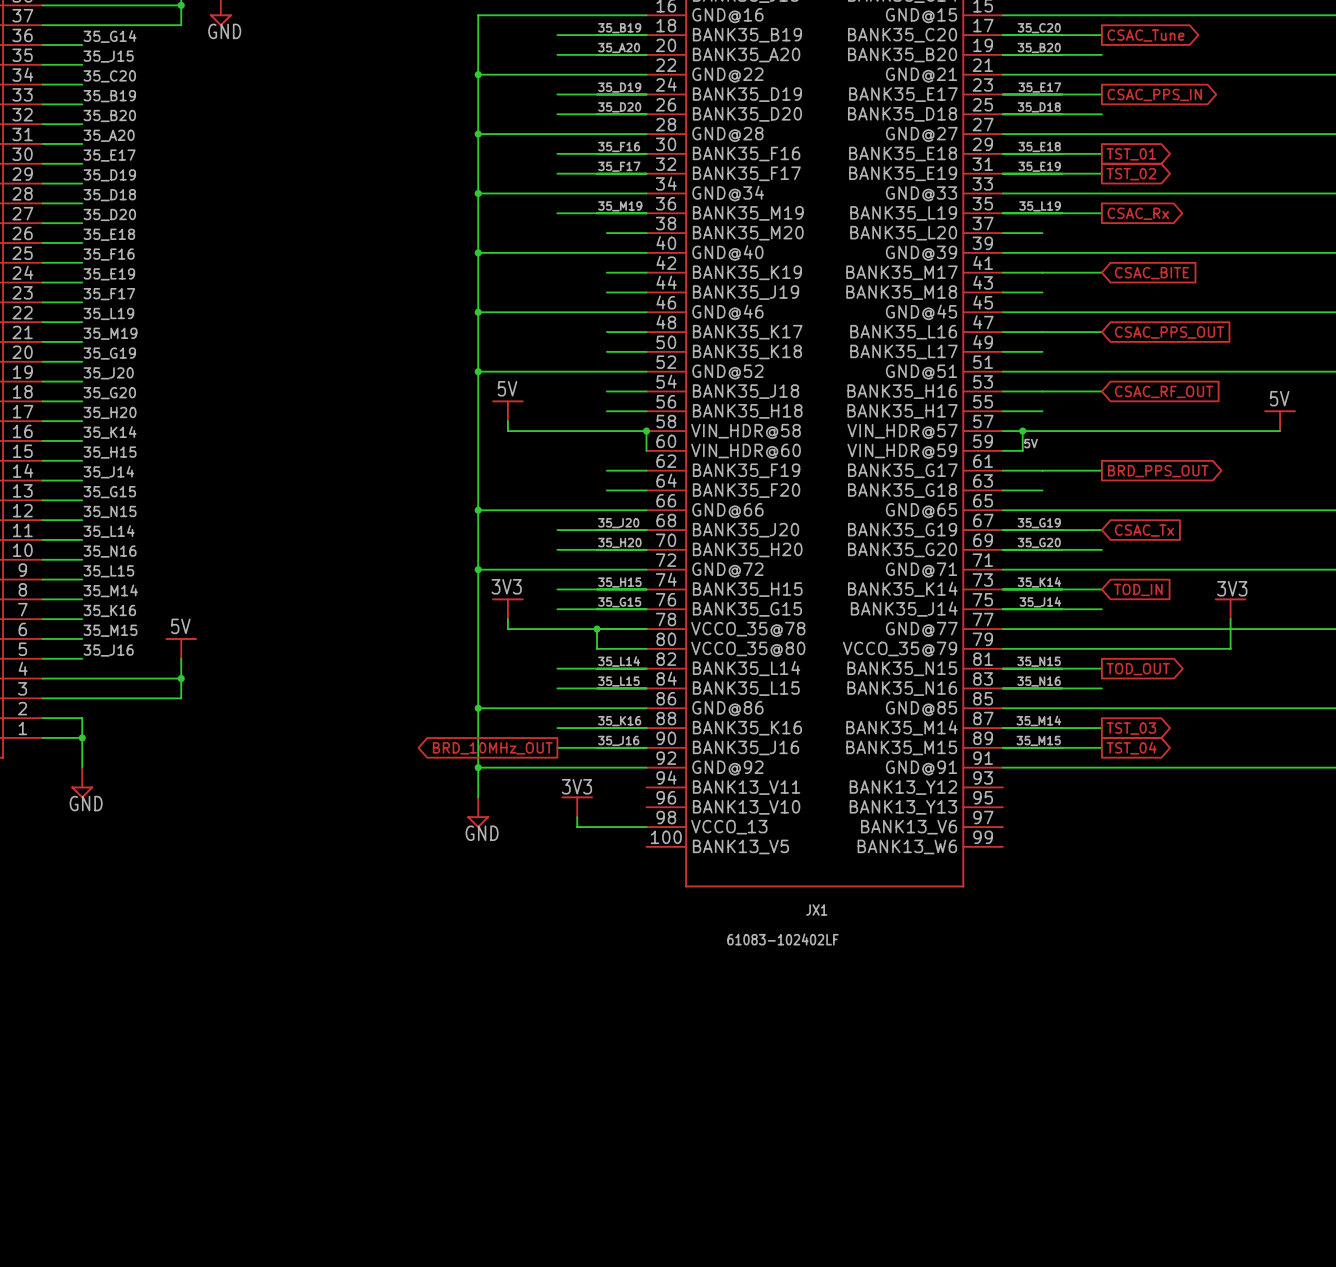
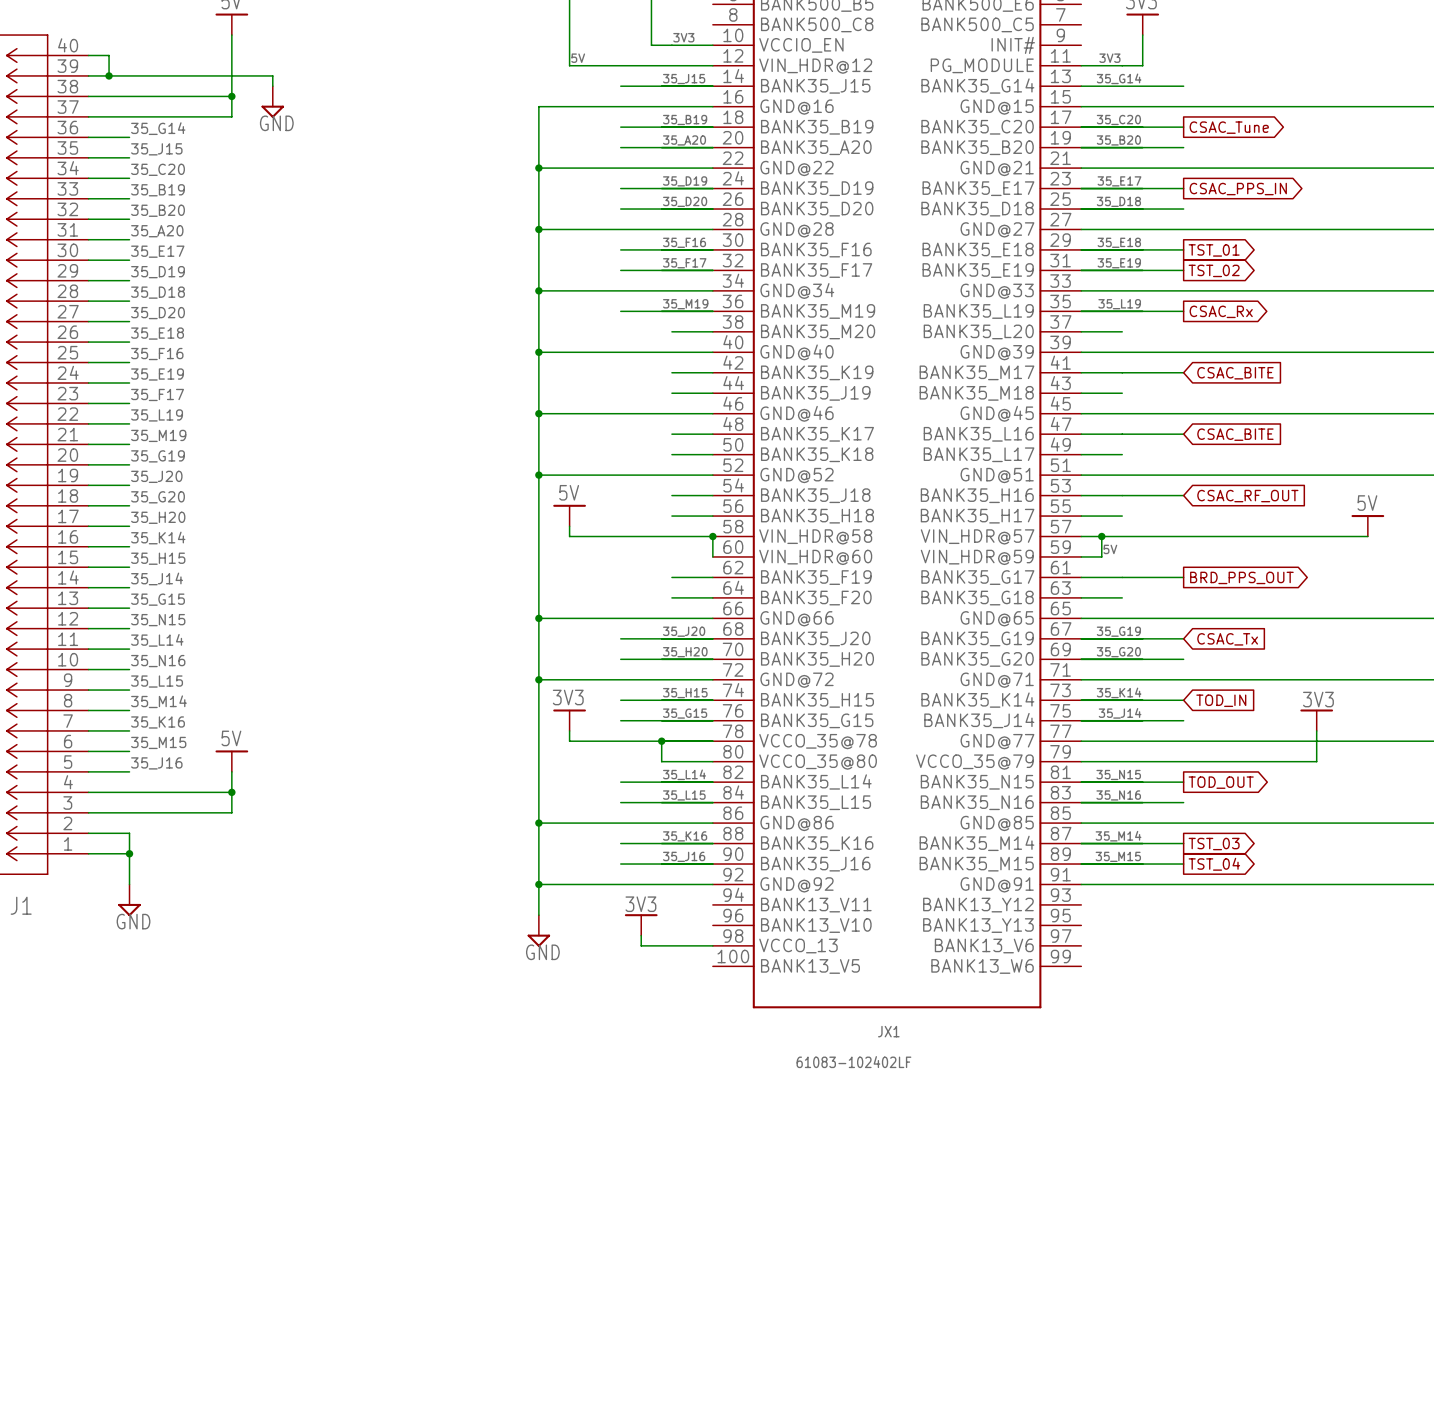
global label: CSAC_PPS_OUT (1169, 332) -> CSAC_BITE (1235, 434)
global label: BRD_10MHz_OUT (492, 748) -> none

